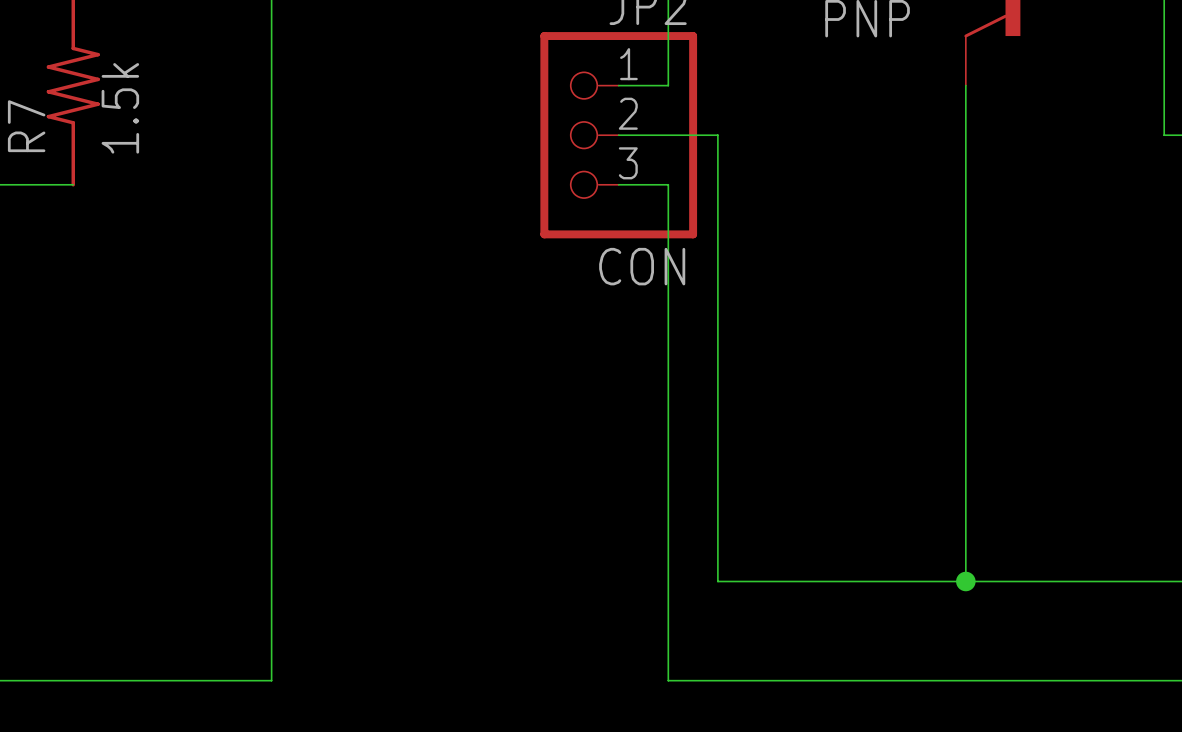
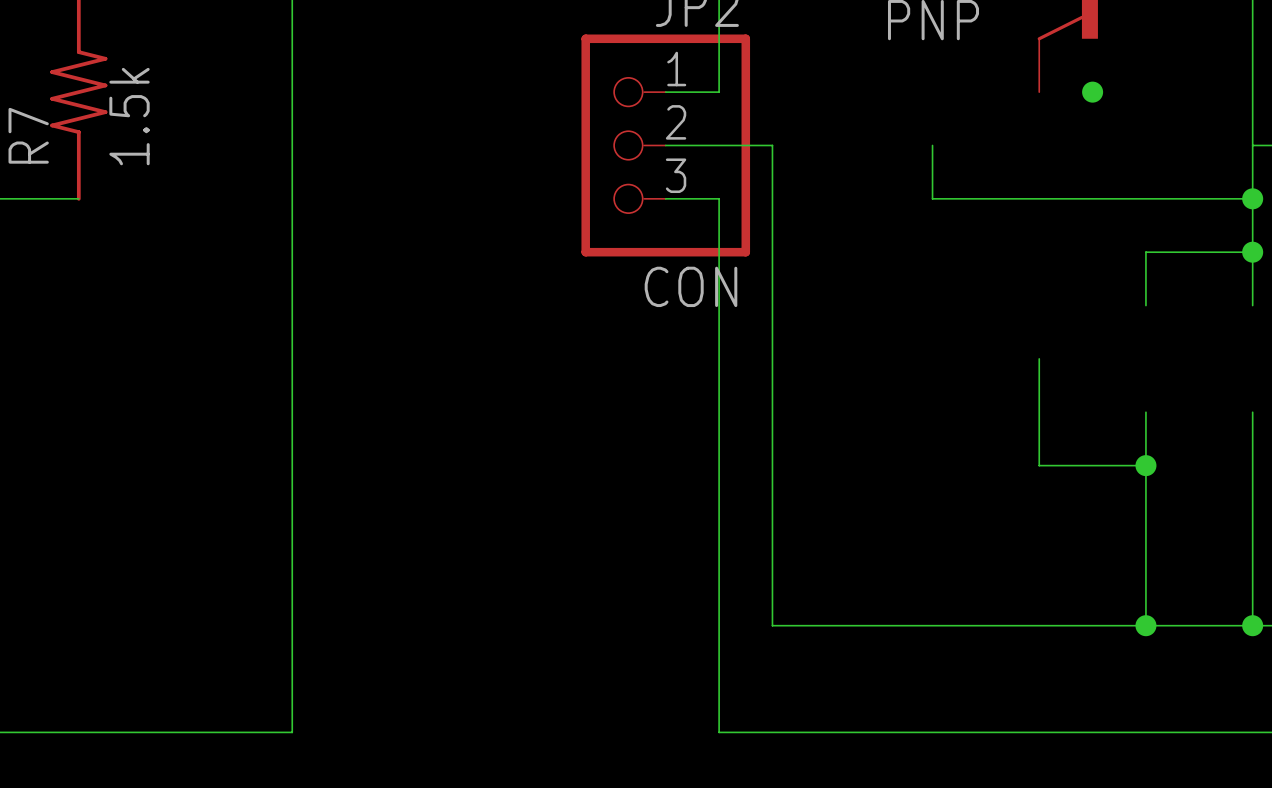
wire: (965, 85) (965, 333) -> none
junction: none -> (1092, 92)
wire: none -> (932, 145) (932, 198) (1252, 198)
wire: none -> (1252, 145) (1252, 305)
junction: none -> (1252, 198)
wire: none -> (1252, 252) (1145, 252) (1145, 305)
junction: none -> (1252, 252)
wire: none -> (1145, 412) (1145, 625)
wire: none -> (1252, 412) (1252, 625)
wire: (965, 432) (965, 581) -> (1039, 465) (1145, 465)
junction: none -> (1145, 465)
junction: (965, 581) -> none
junction: none -> (1145, 625)
junction: none -> (1252, 625)

